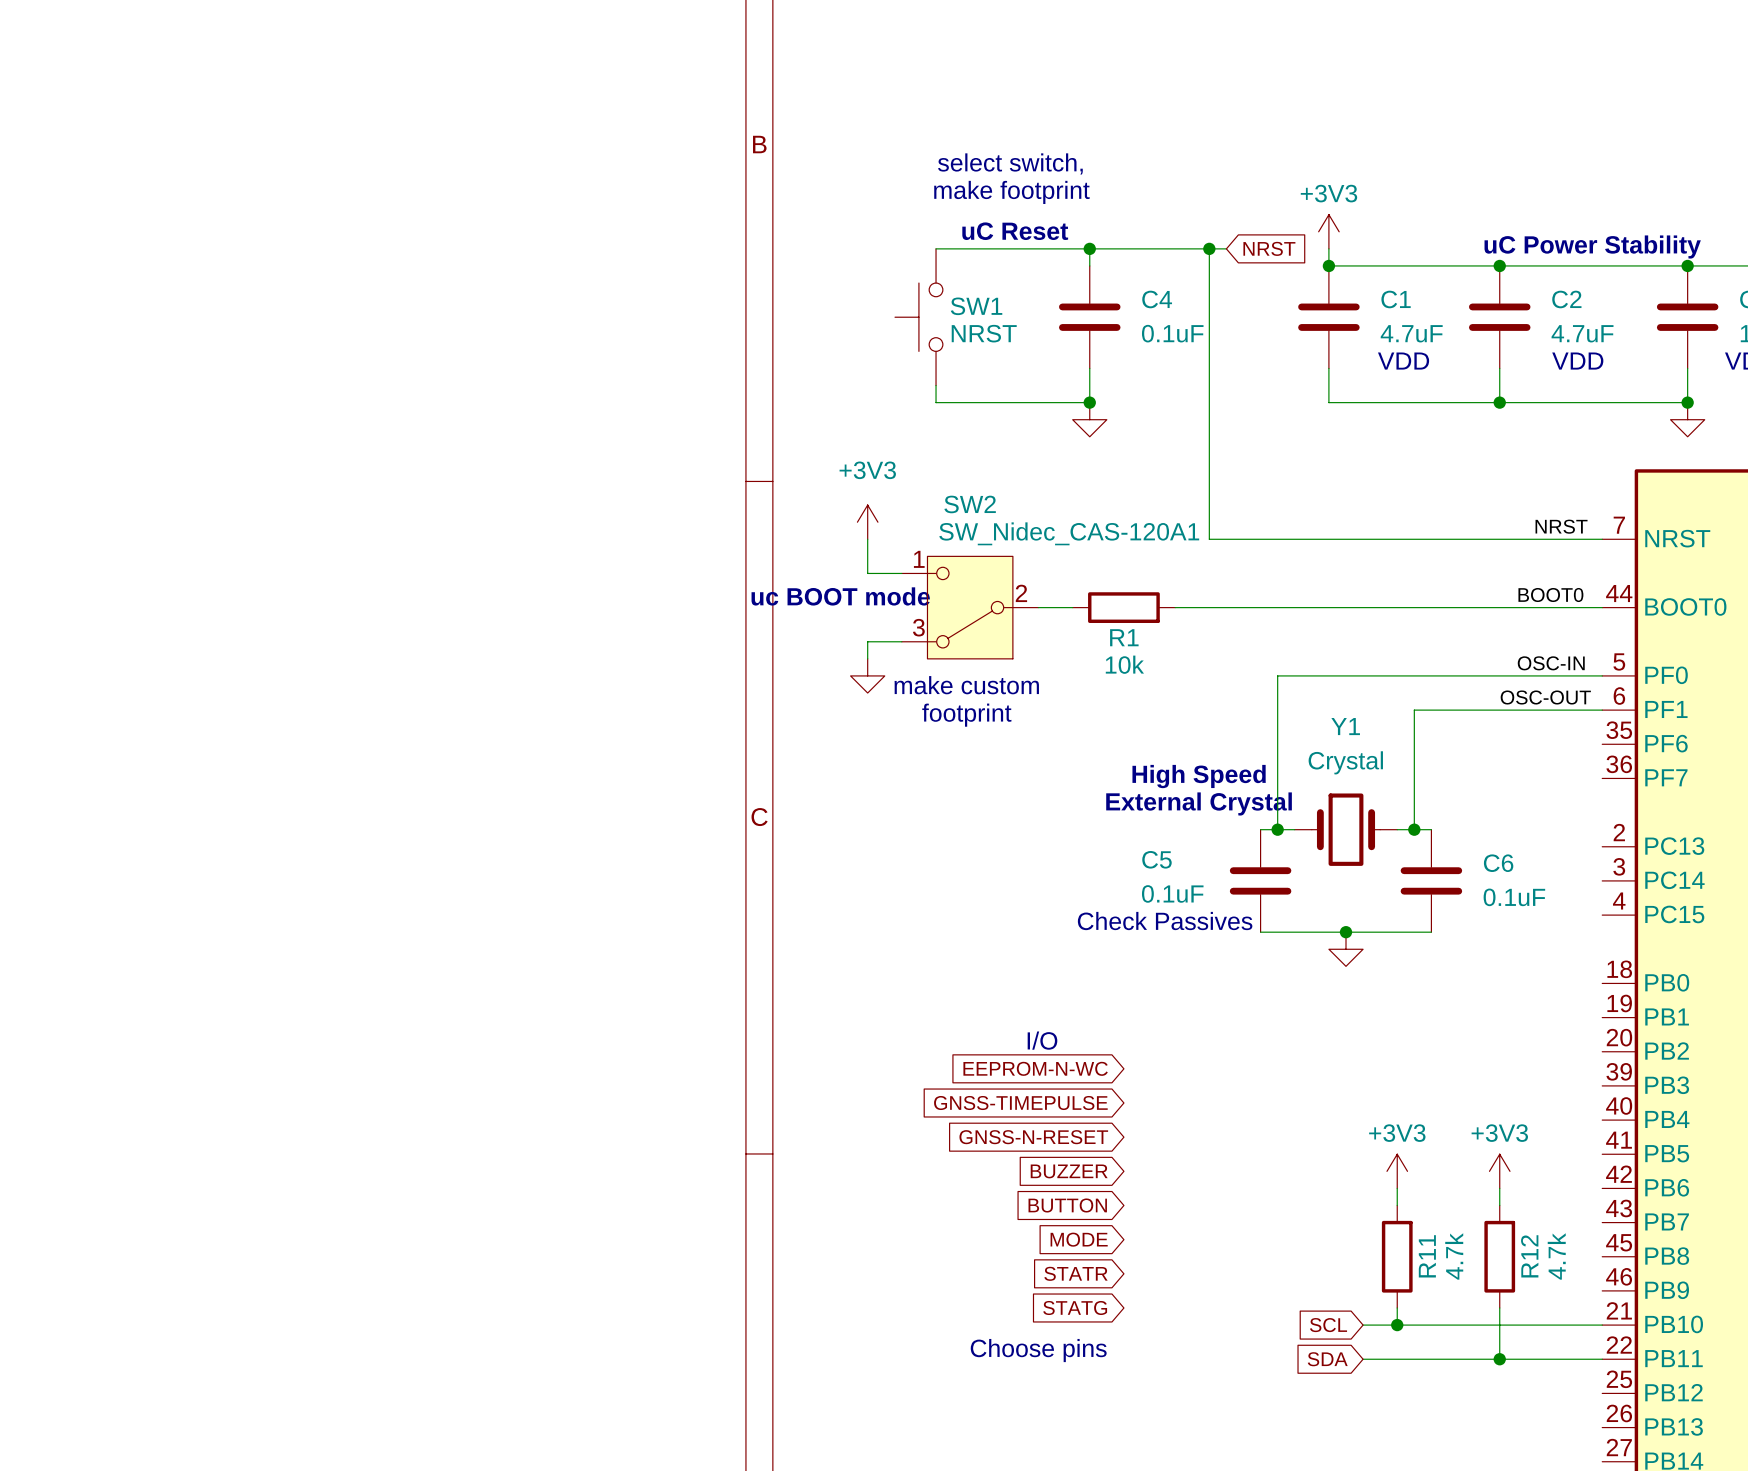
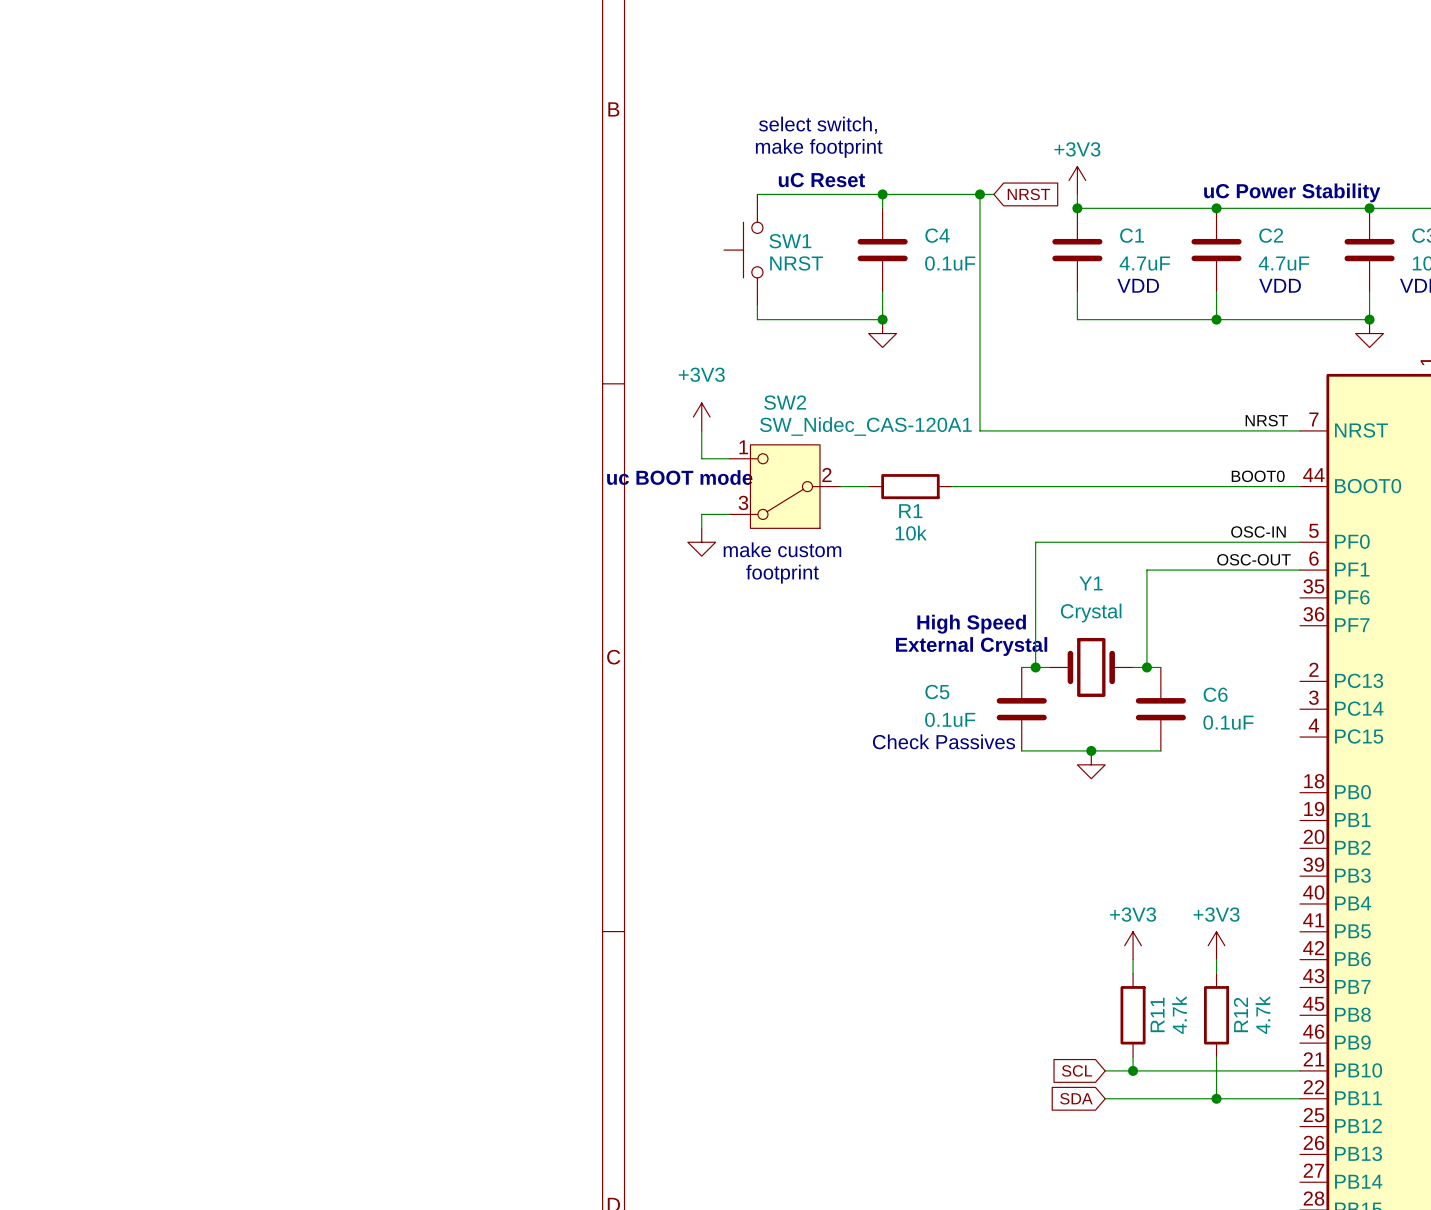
text: I/O (1042, 1040) -> none
global label: EEPROM-N-WC (1035, 1068) -> none
global label: GNSS-TIMEPULSE (1020, 1103) -> none
global label: GNSS-N-RESET (1033, 1137) -> none
global label: BUZZER (1069, 1171) -> none
global label: BUTTON (1067, 1205) -> none
global label: MODE (1079, 1239) -> none
global label: STATR (1075, 1273) -> none
global label: STATG (1075, 1307) -> none
text: Choose pins (1038, 1350) -> none

